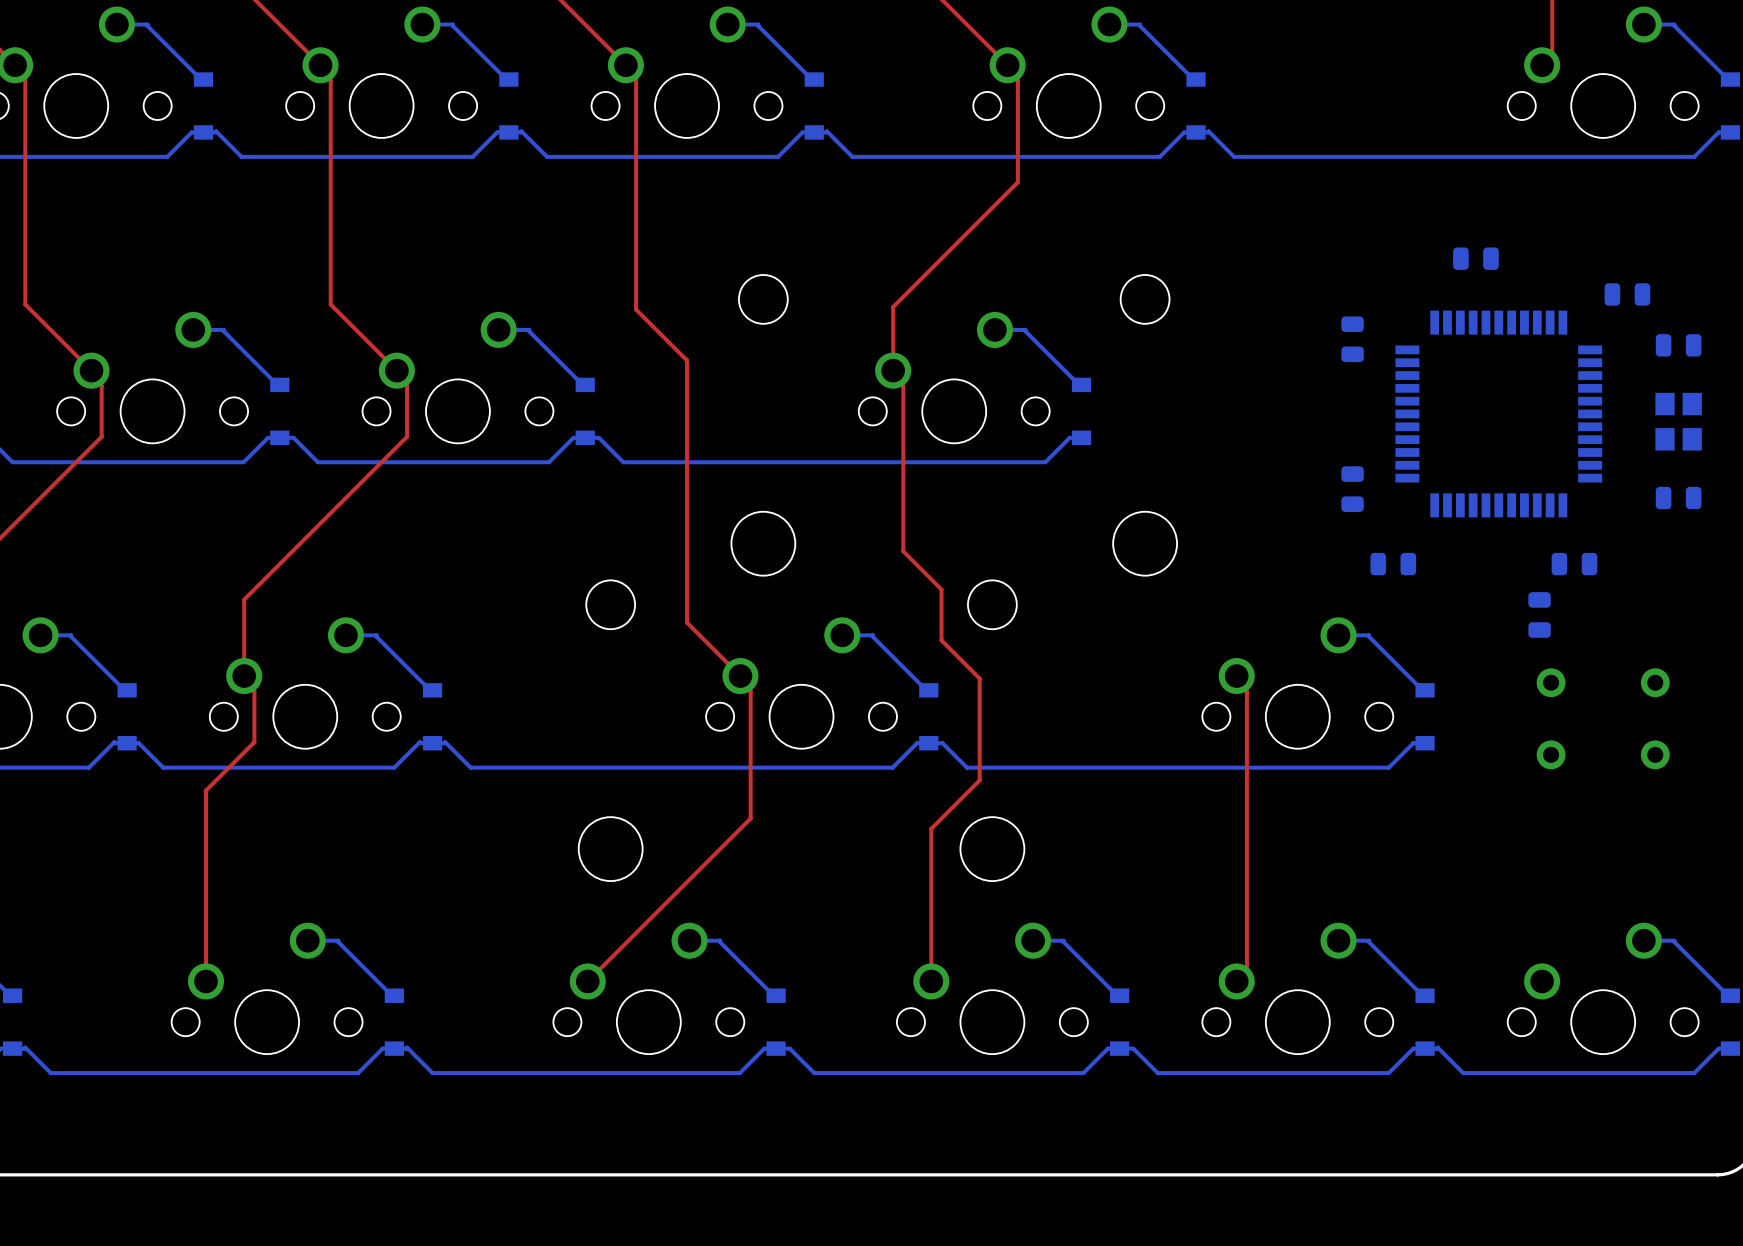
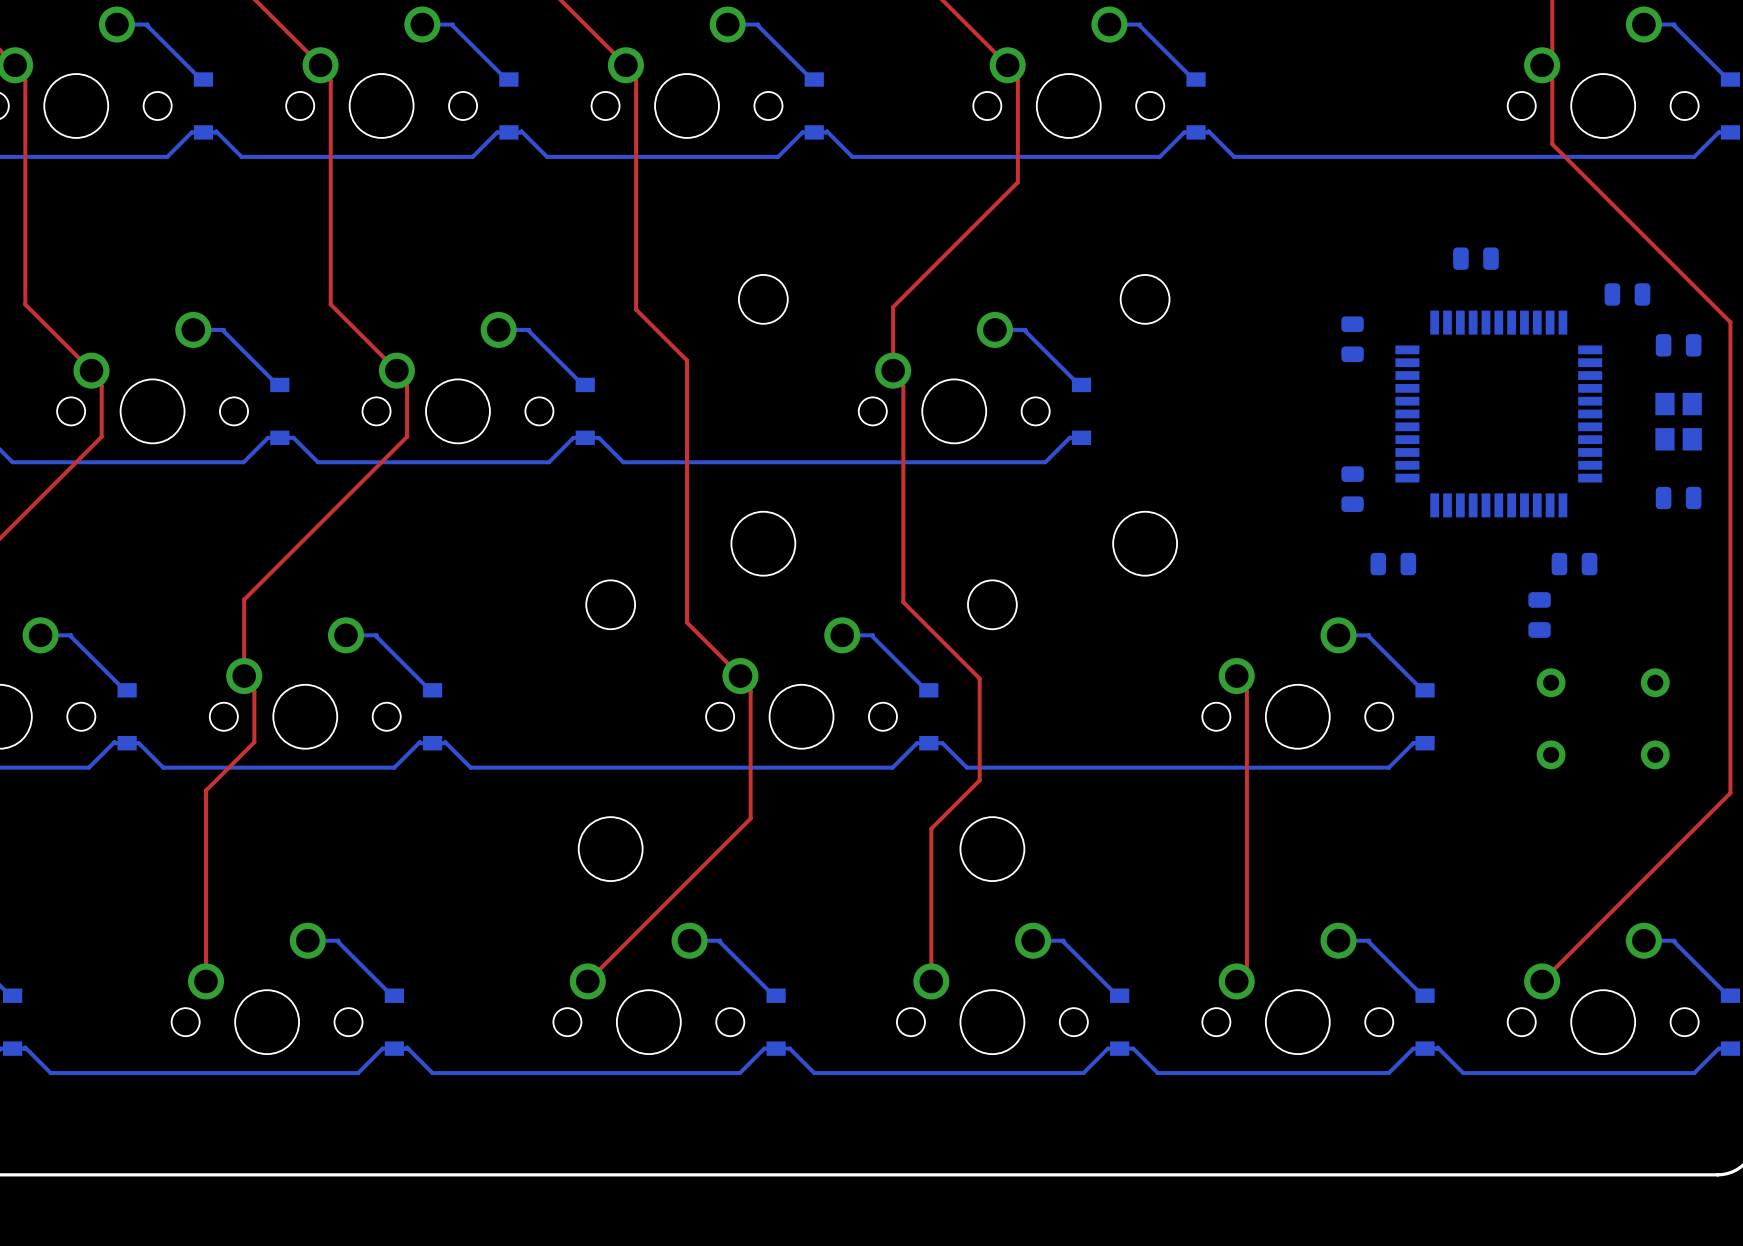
top track: none -> (1542, 65) (1542, 70) (1552, 80) (1552, 144) (1730, 322) (1730, 793) (1542, 981)
top track: (903, 551) (941, 589) (941, 640) -> (903, 551) (903, 602) (941, 640)

